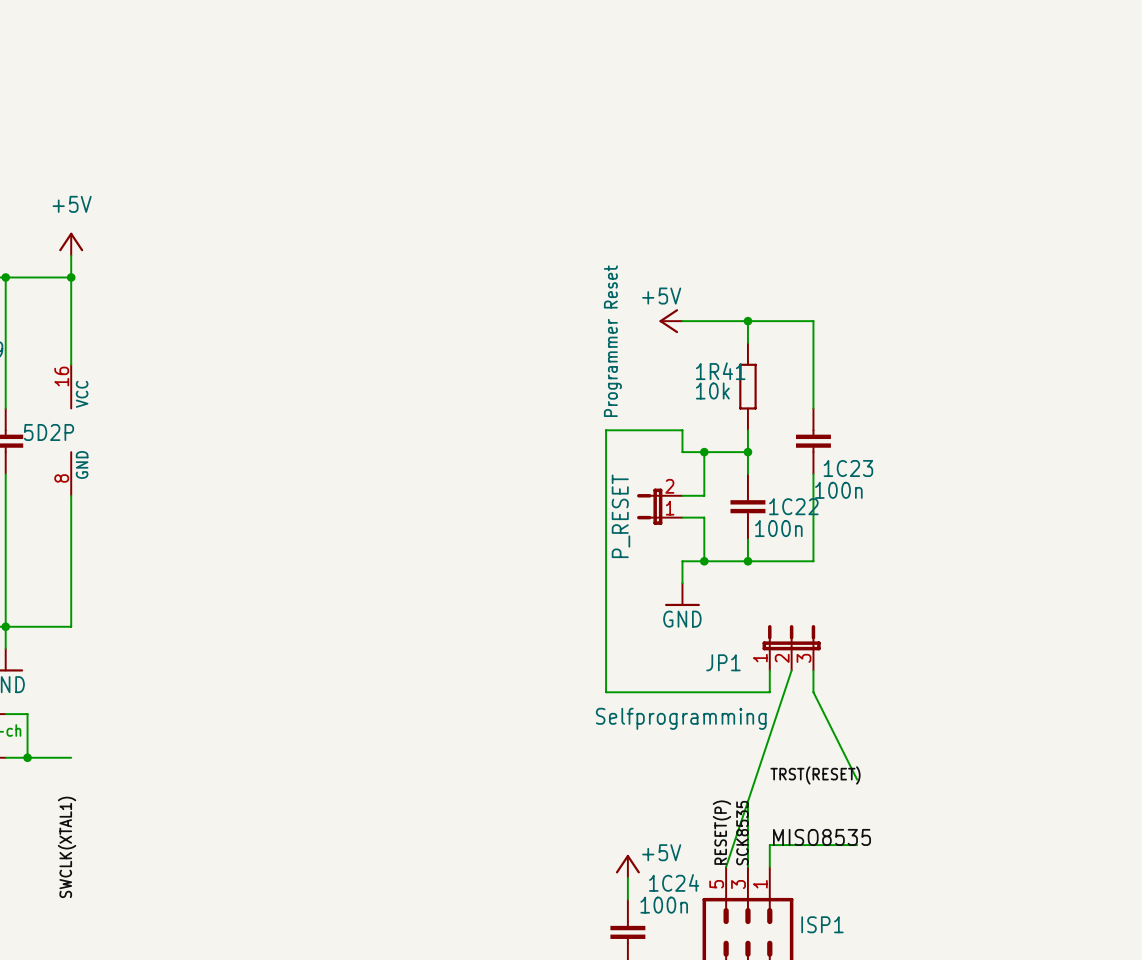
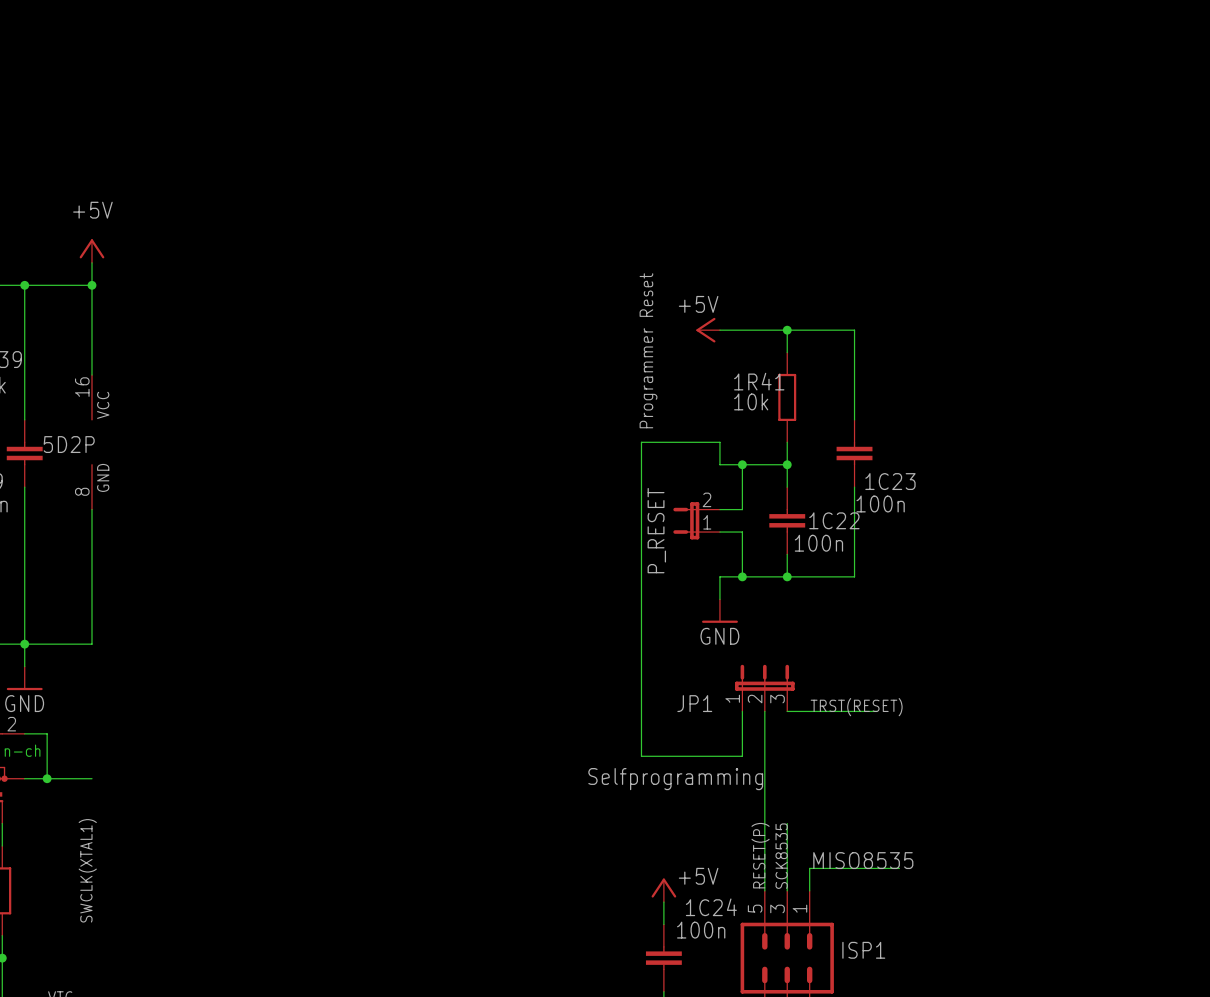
JP1 position: (791, 647) -> (764, 688)
wire: (769, 670) (769, 692) -> (876, 711) (809, 711)
wire: (791, 670) (726, 866) -> (764, 711) (764, 890)
wire: (813, 670) (813, 692) (857, 779) -> none
wire: (606, 692) (747, 692) -> (641, 711) (641, 756) (742, 756) (742, 711)
JP1 value position: Selfprogramming (681, 718) -> Selfprogramming (675, 779)
label position: TRST(RESET) (815, 775) -> TRST(RESET) (856, 707)

